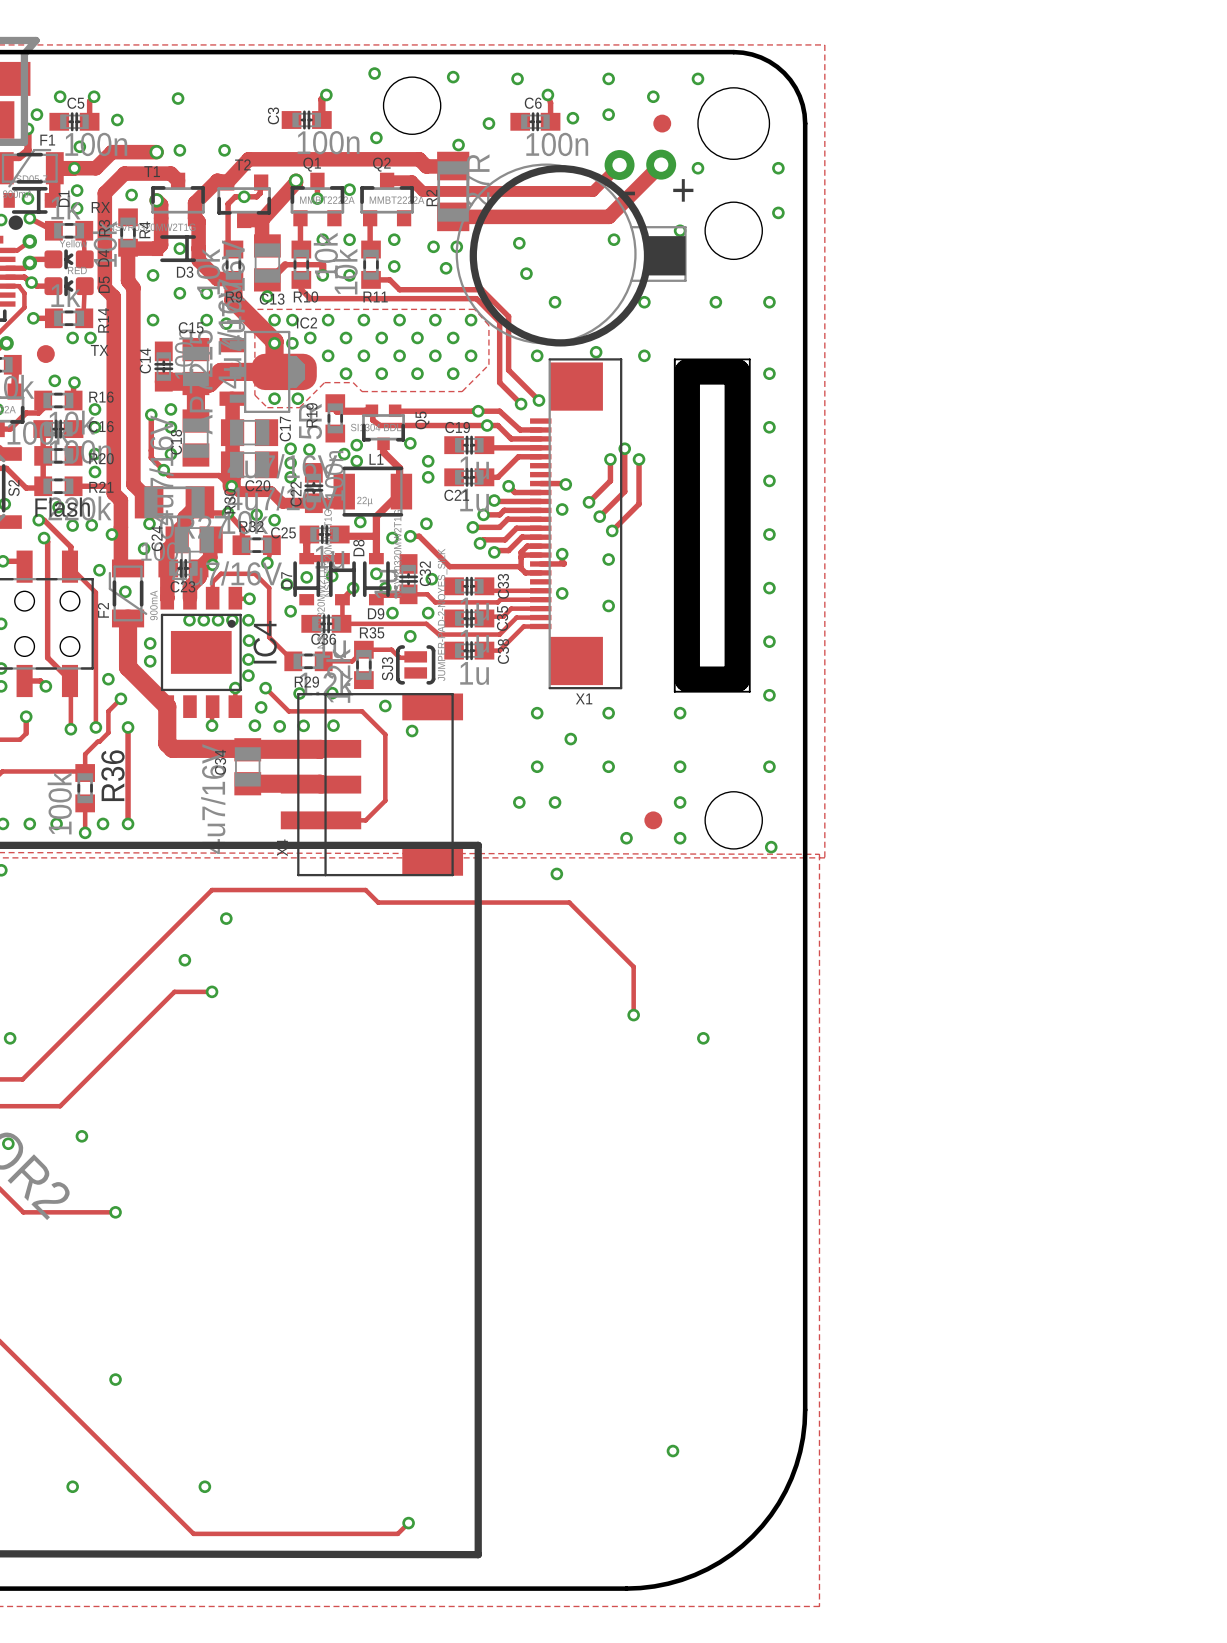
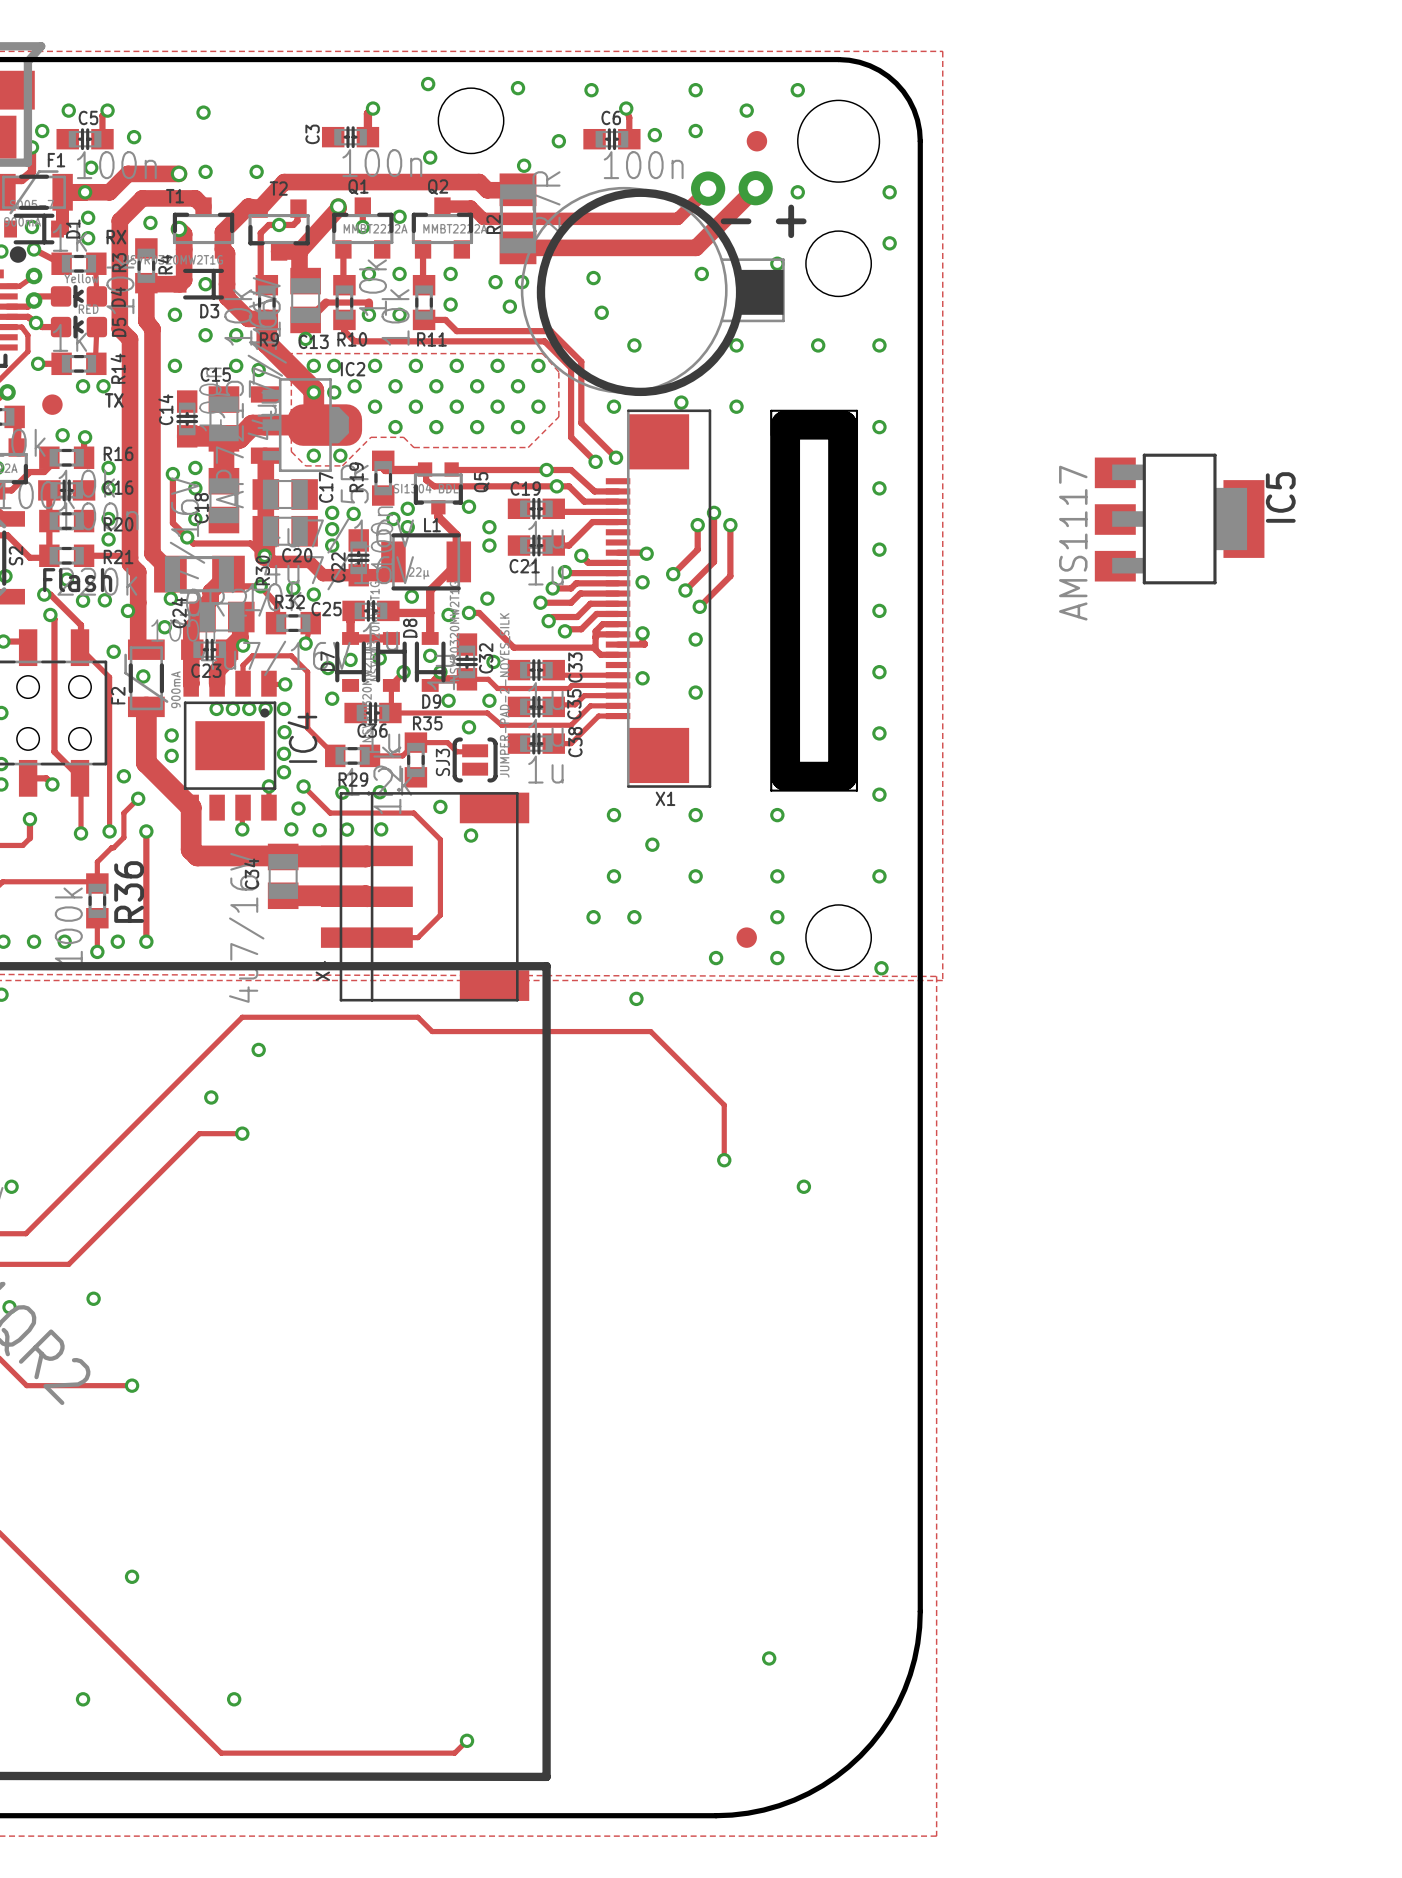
IC5: none -> AMS1117 (1179, 519)

